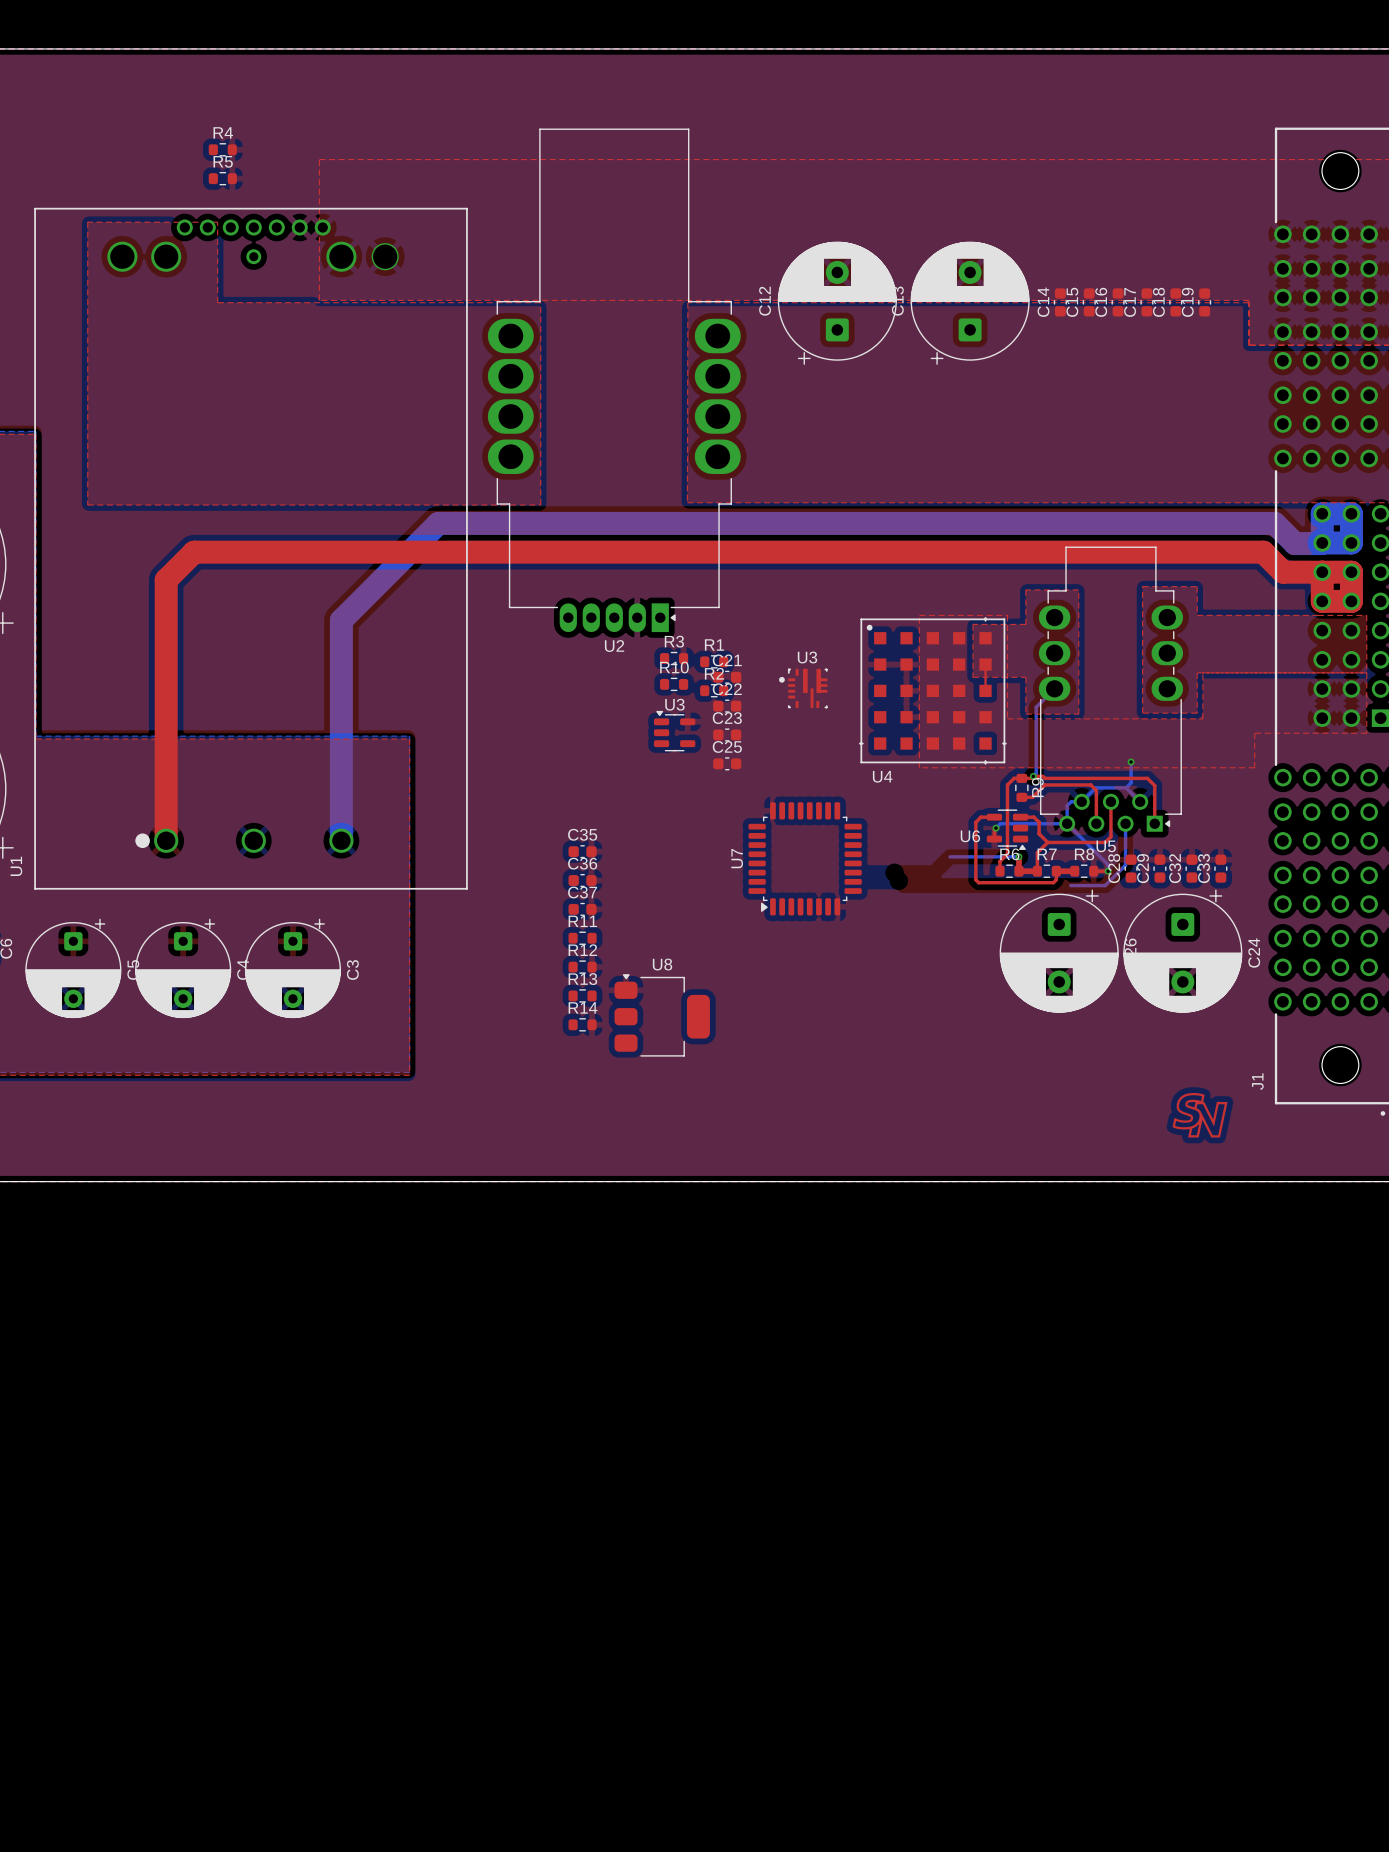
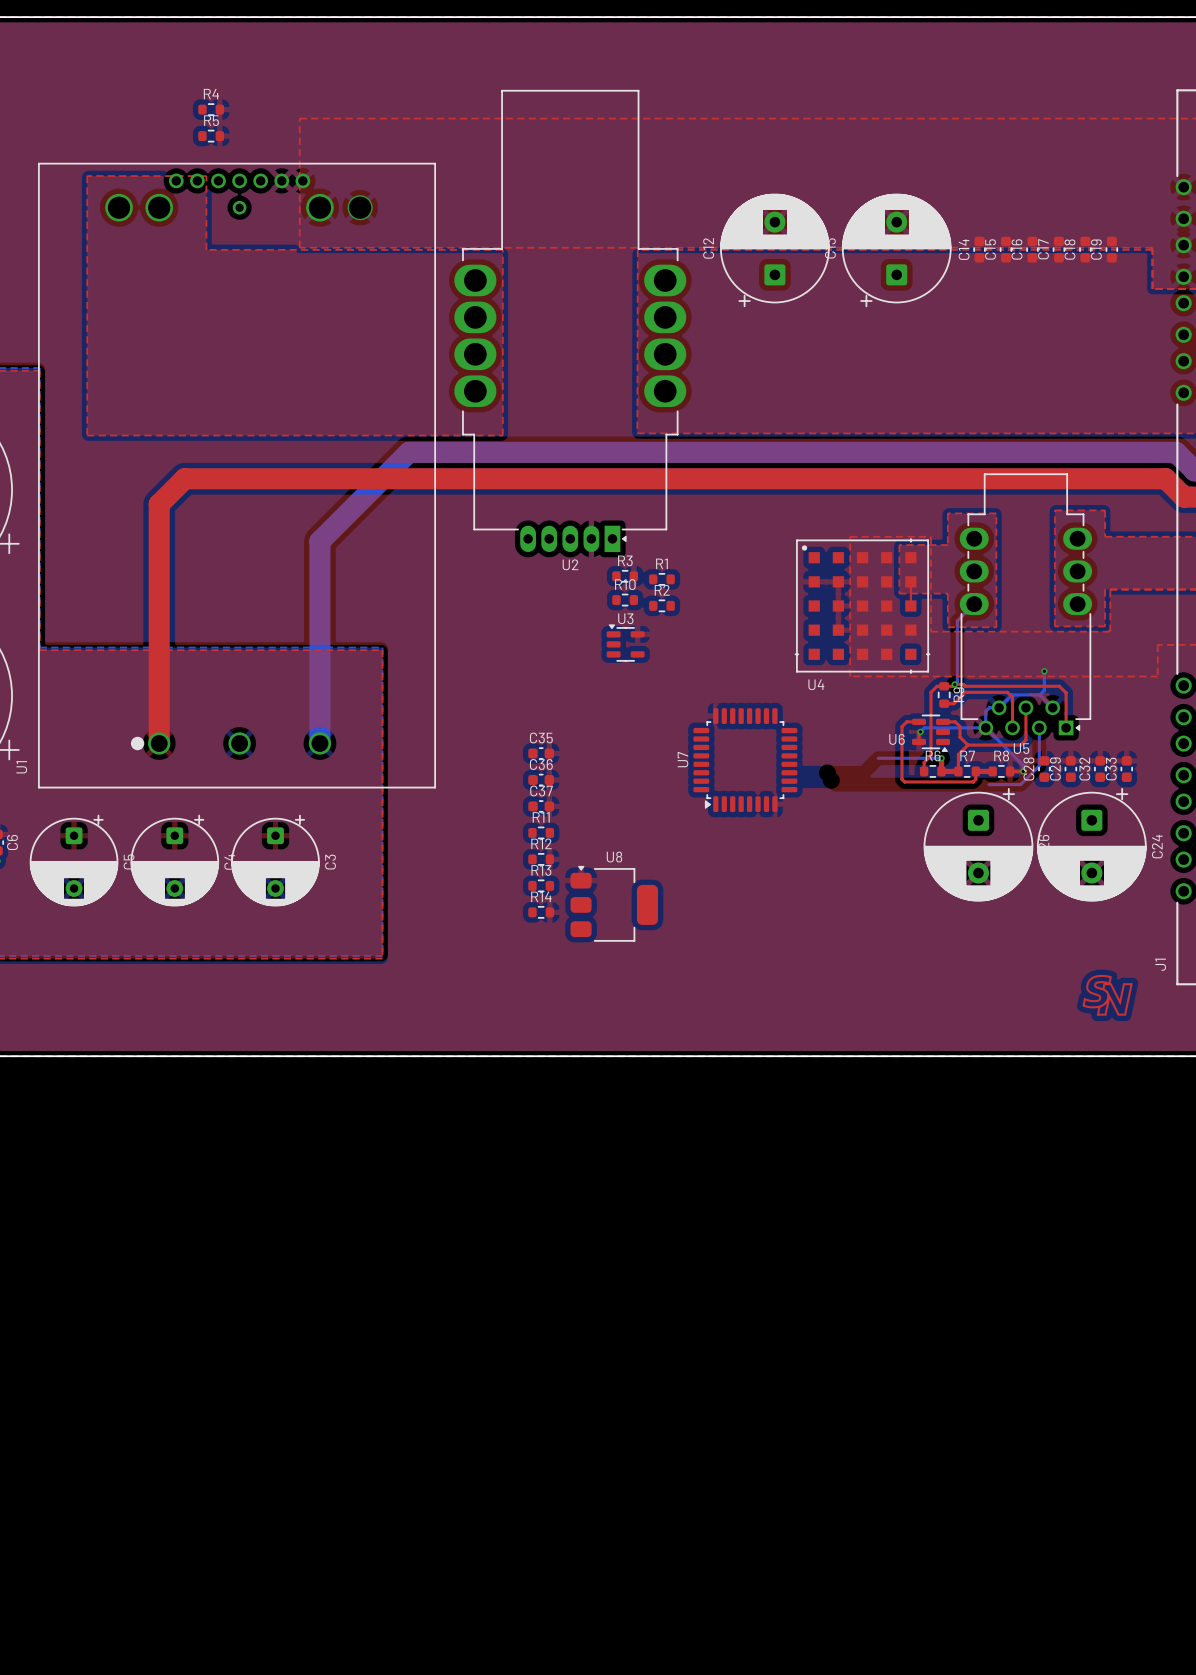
C21: (727, 677) -> none
U3: (803, 688) -> none
C22: (727, 706) -> none
C23: (727, 734) -> none
C25: (727, 763) -> none

